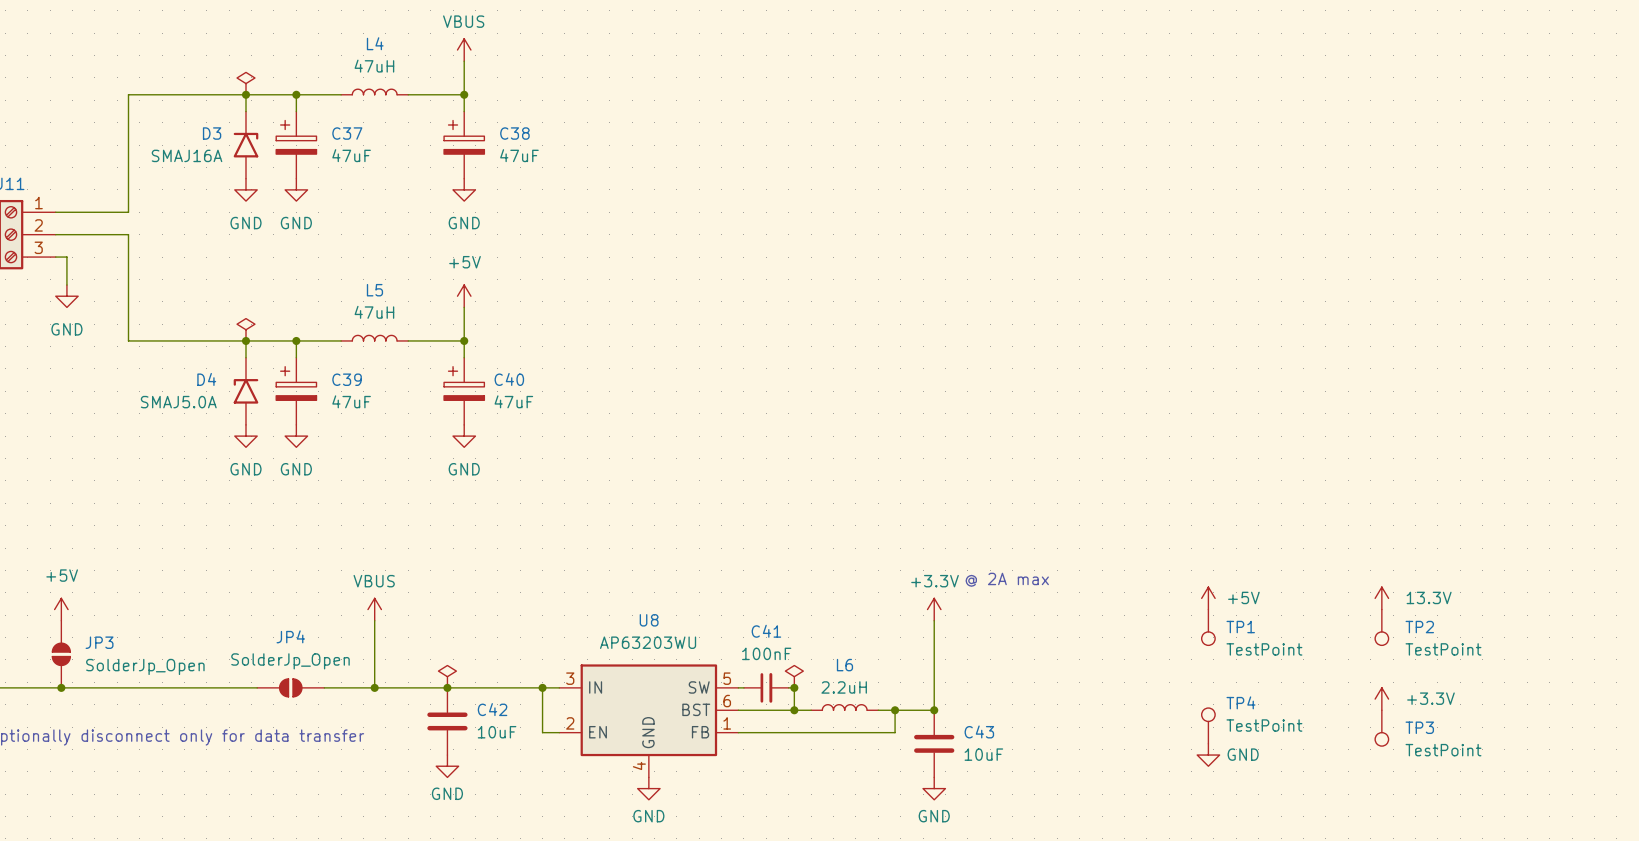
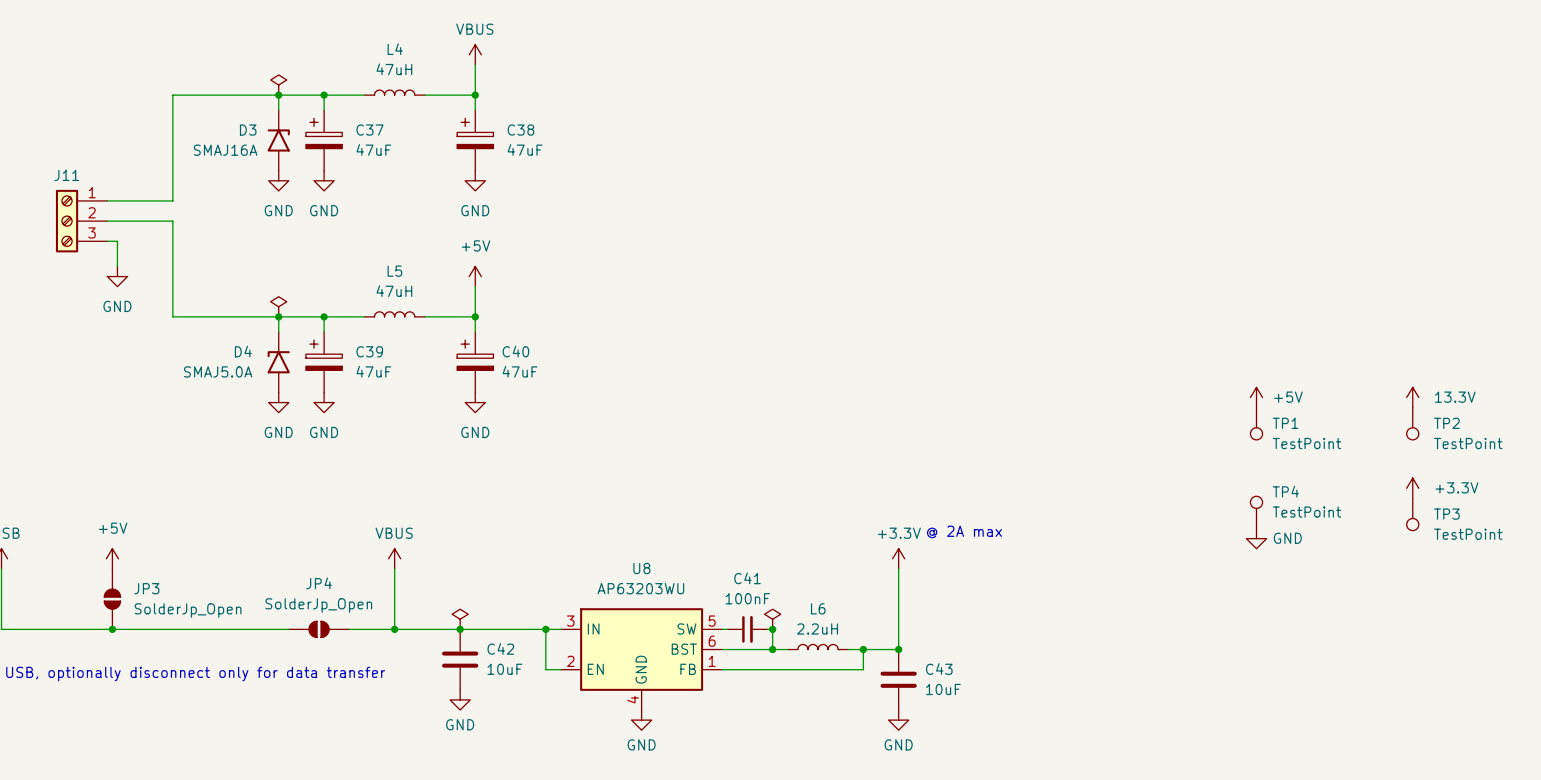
power symbol position: +5V (1208, 598) -> +5V (1256, 397)
power symbol position: 13.3V (1381, 598) -> 13.3V (1412, 397)
TP1 position: (1208, 627) -> (1256, 423)
TP2 position: (1381, 627) -> (1412, 423)
power symbol position: +3.3V (1381, 699) -> +3.3V (1412, 488)
TP4 position: (1208, 725) -> (1256, 512)
TP3 position: (1381, 728) -> (1412, 514)
power symbol position: GND (1208, 755) -> GND (1256, 538)

